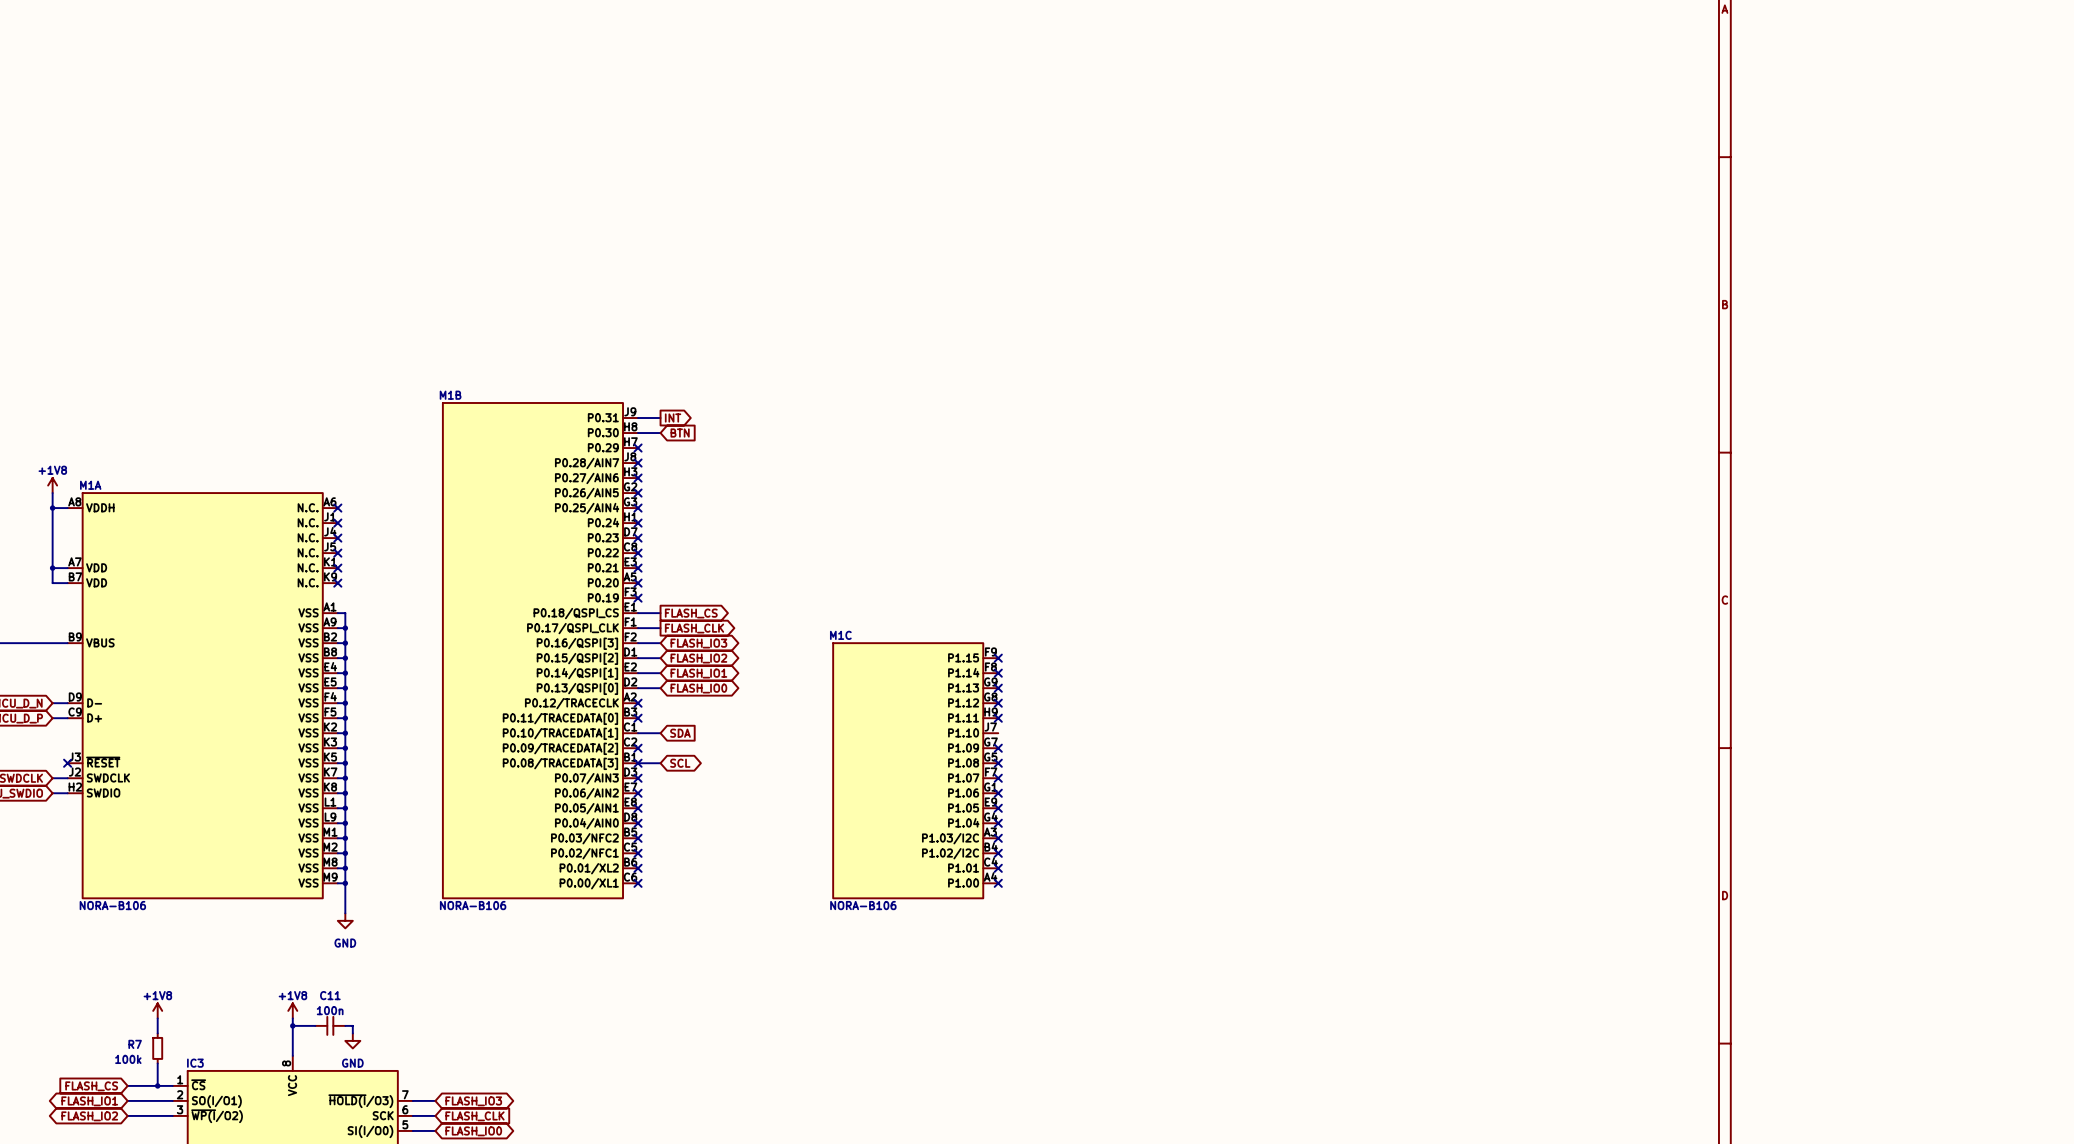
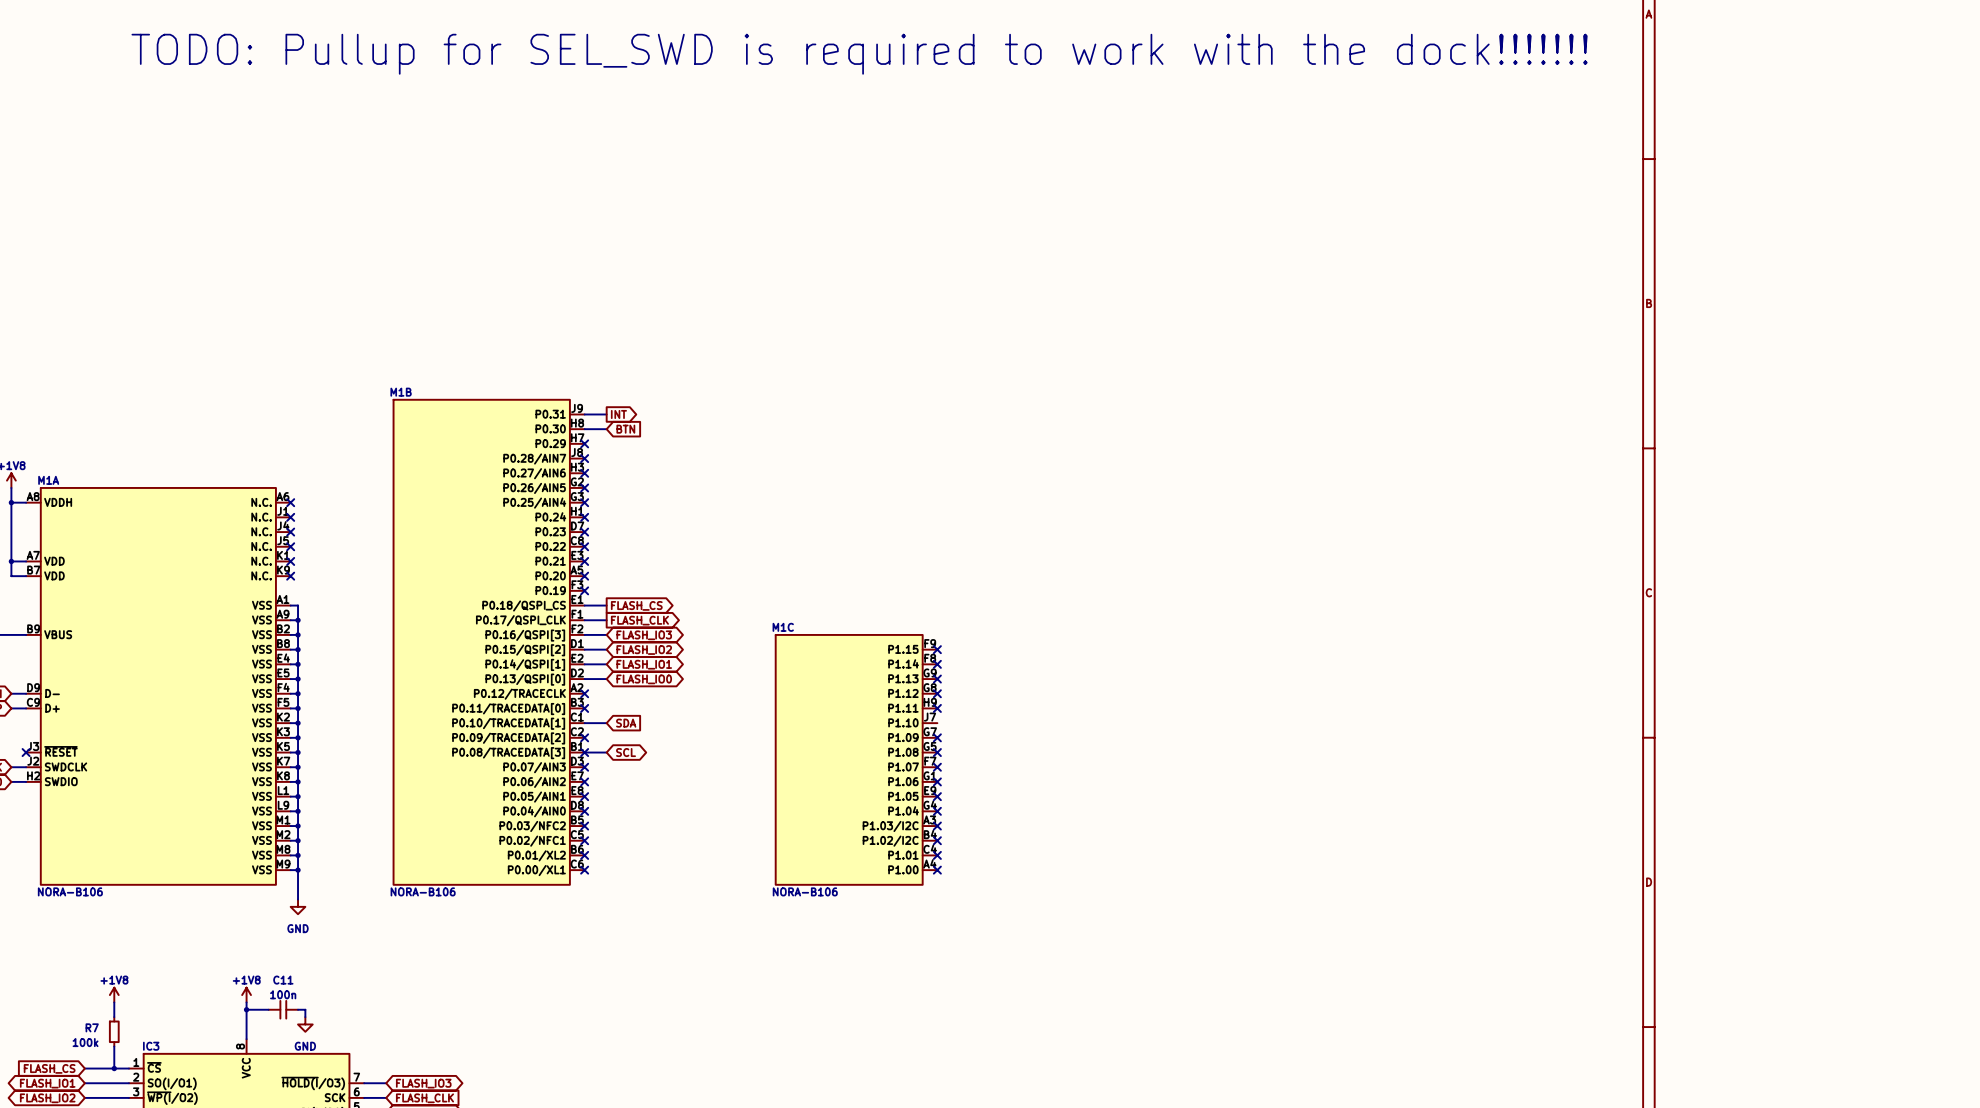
text: none -> TODO: Pullup for SEL_SWD is required to work with the dock!!!!!!! (859, 54)

